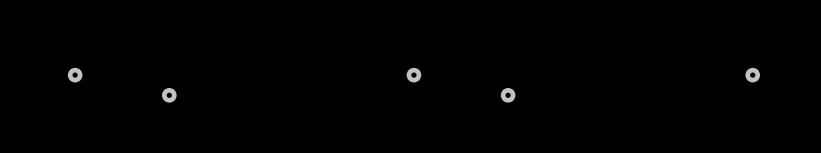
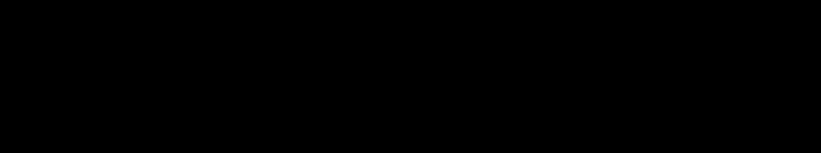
via: (75, 75) -> none
via: (413, 75) -> none
via: (752, 75) -> none
via: (169, 95) -> none
via: (508, 95) -> none

